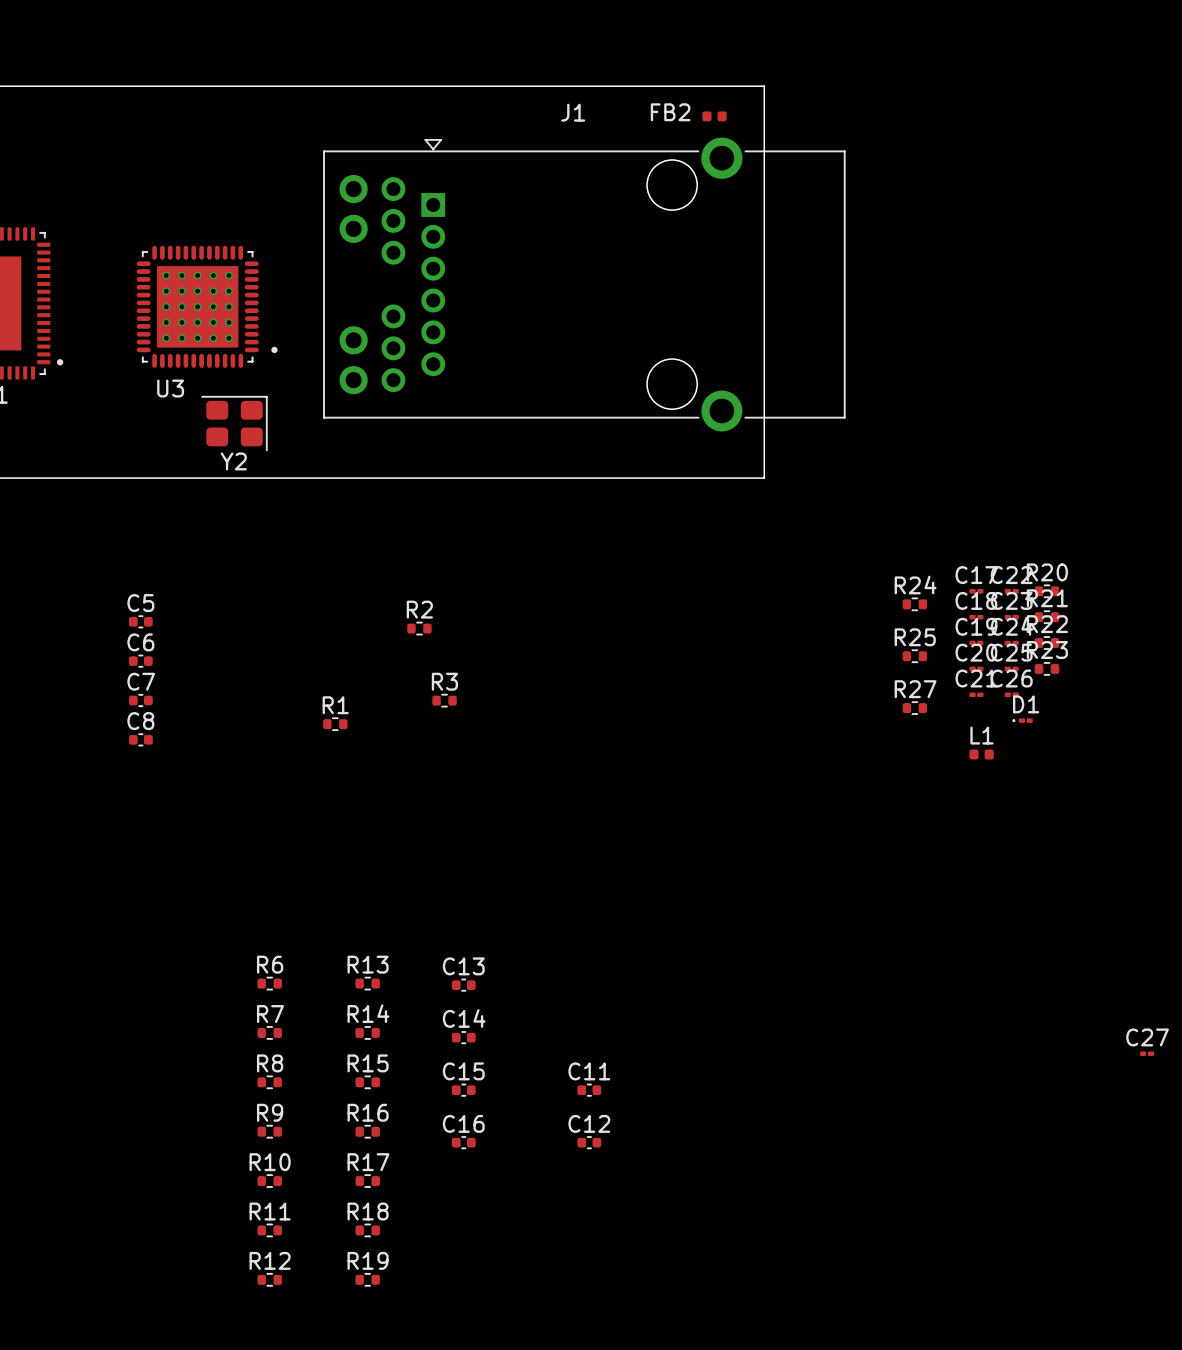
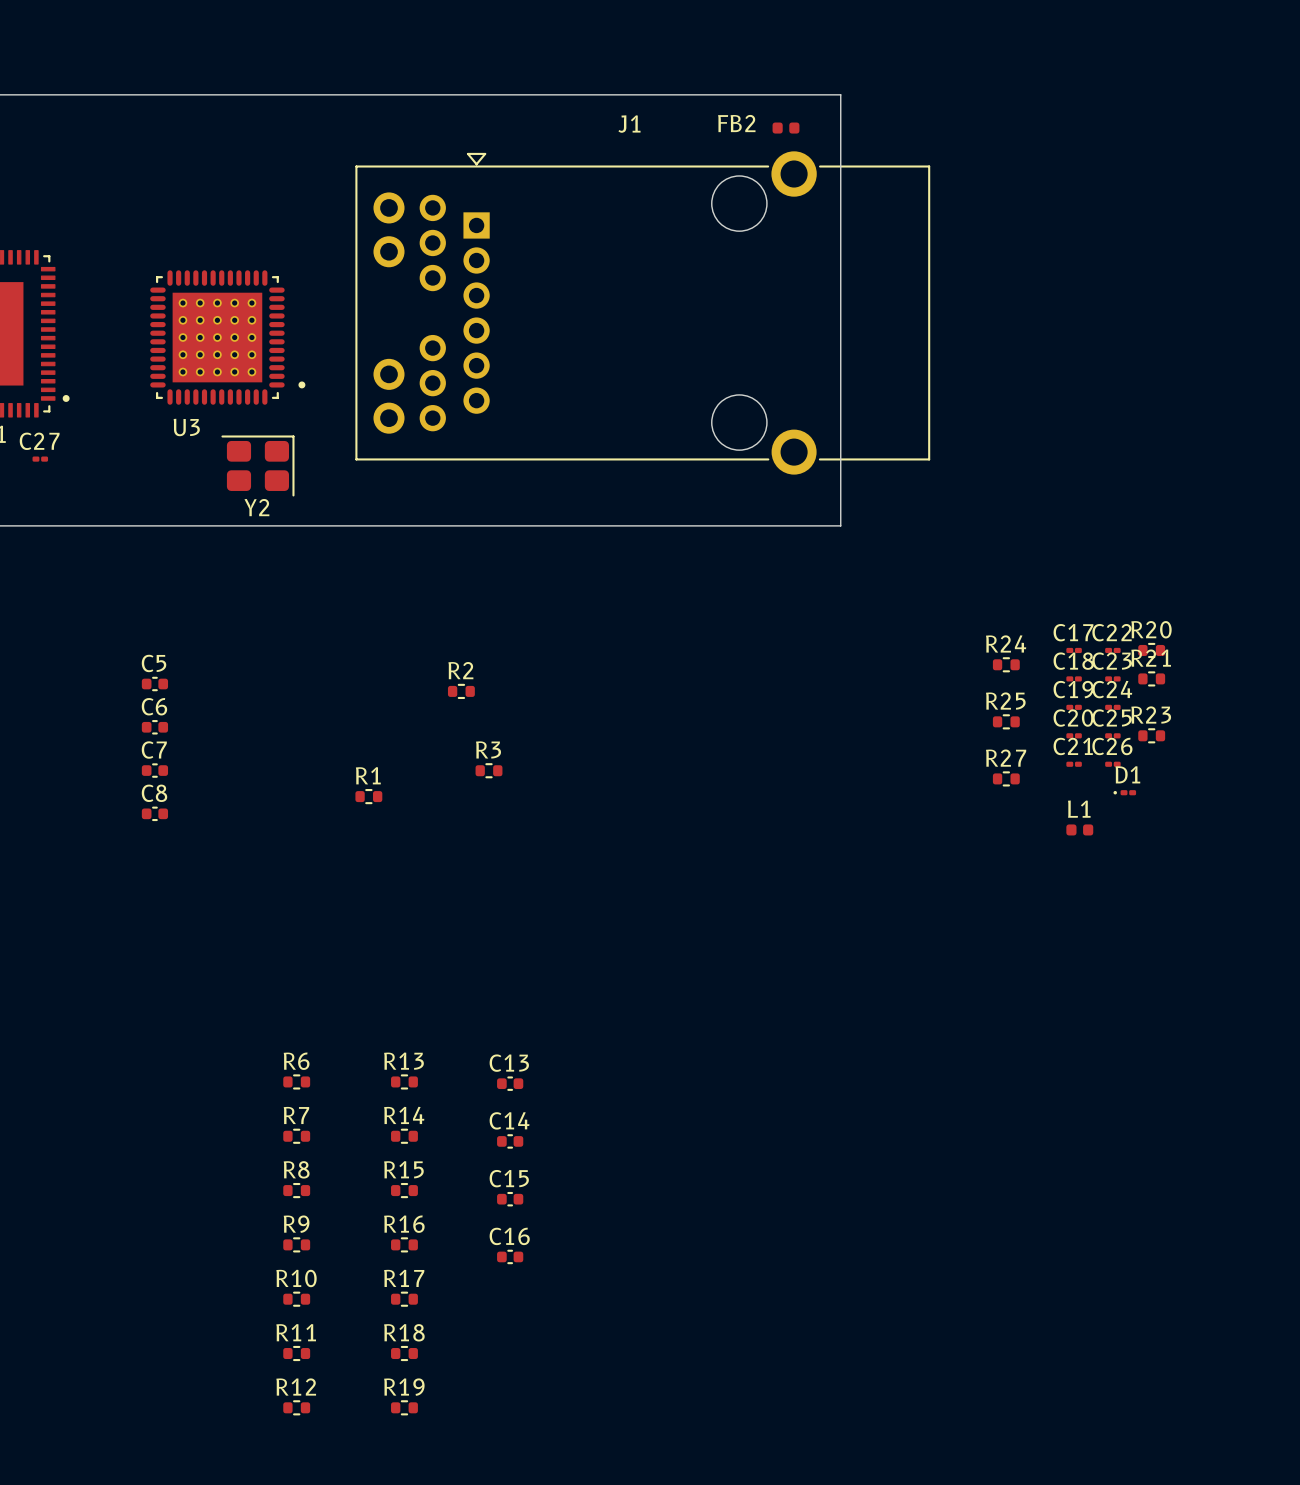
R22: (1046, 643) -> none
C27 position: (1147, 1053) -> (40, 459)
C11: (589, 1090) -> none
C12: (589, 1142) -> none

